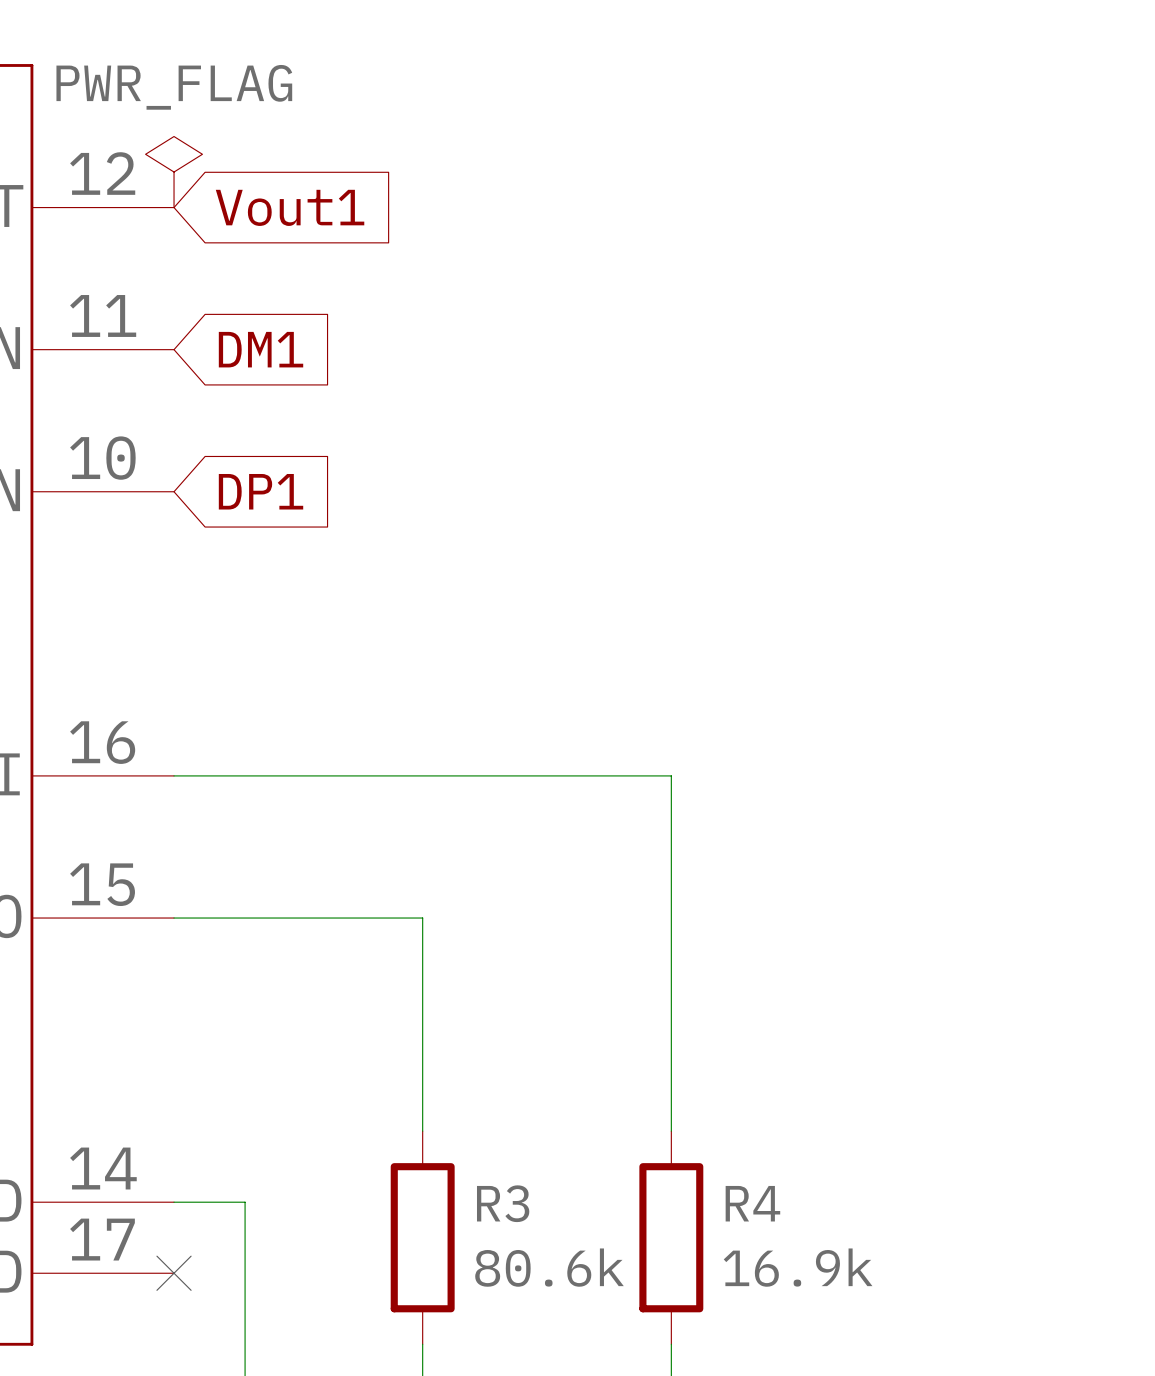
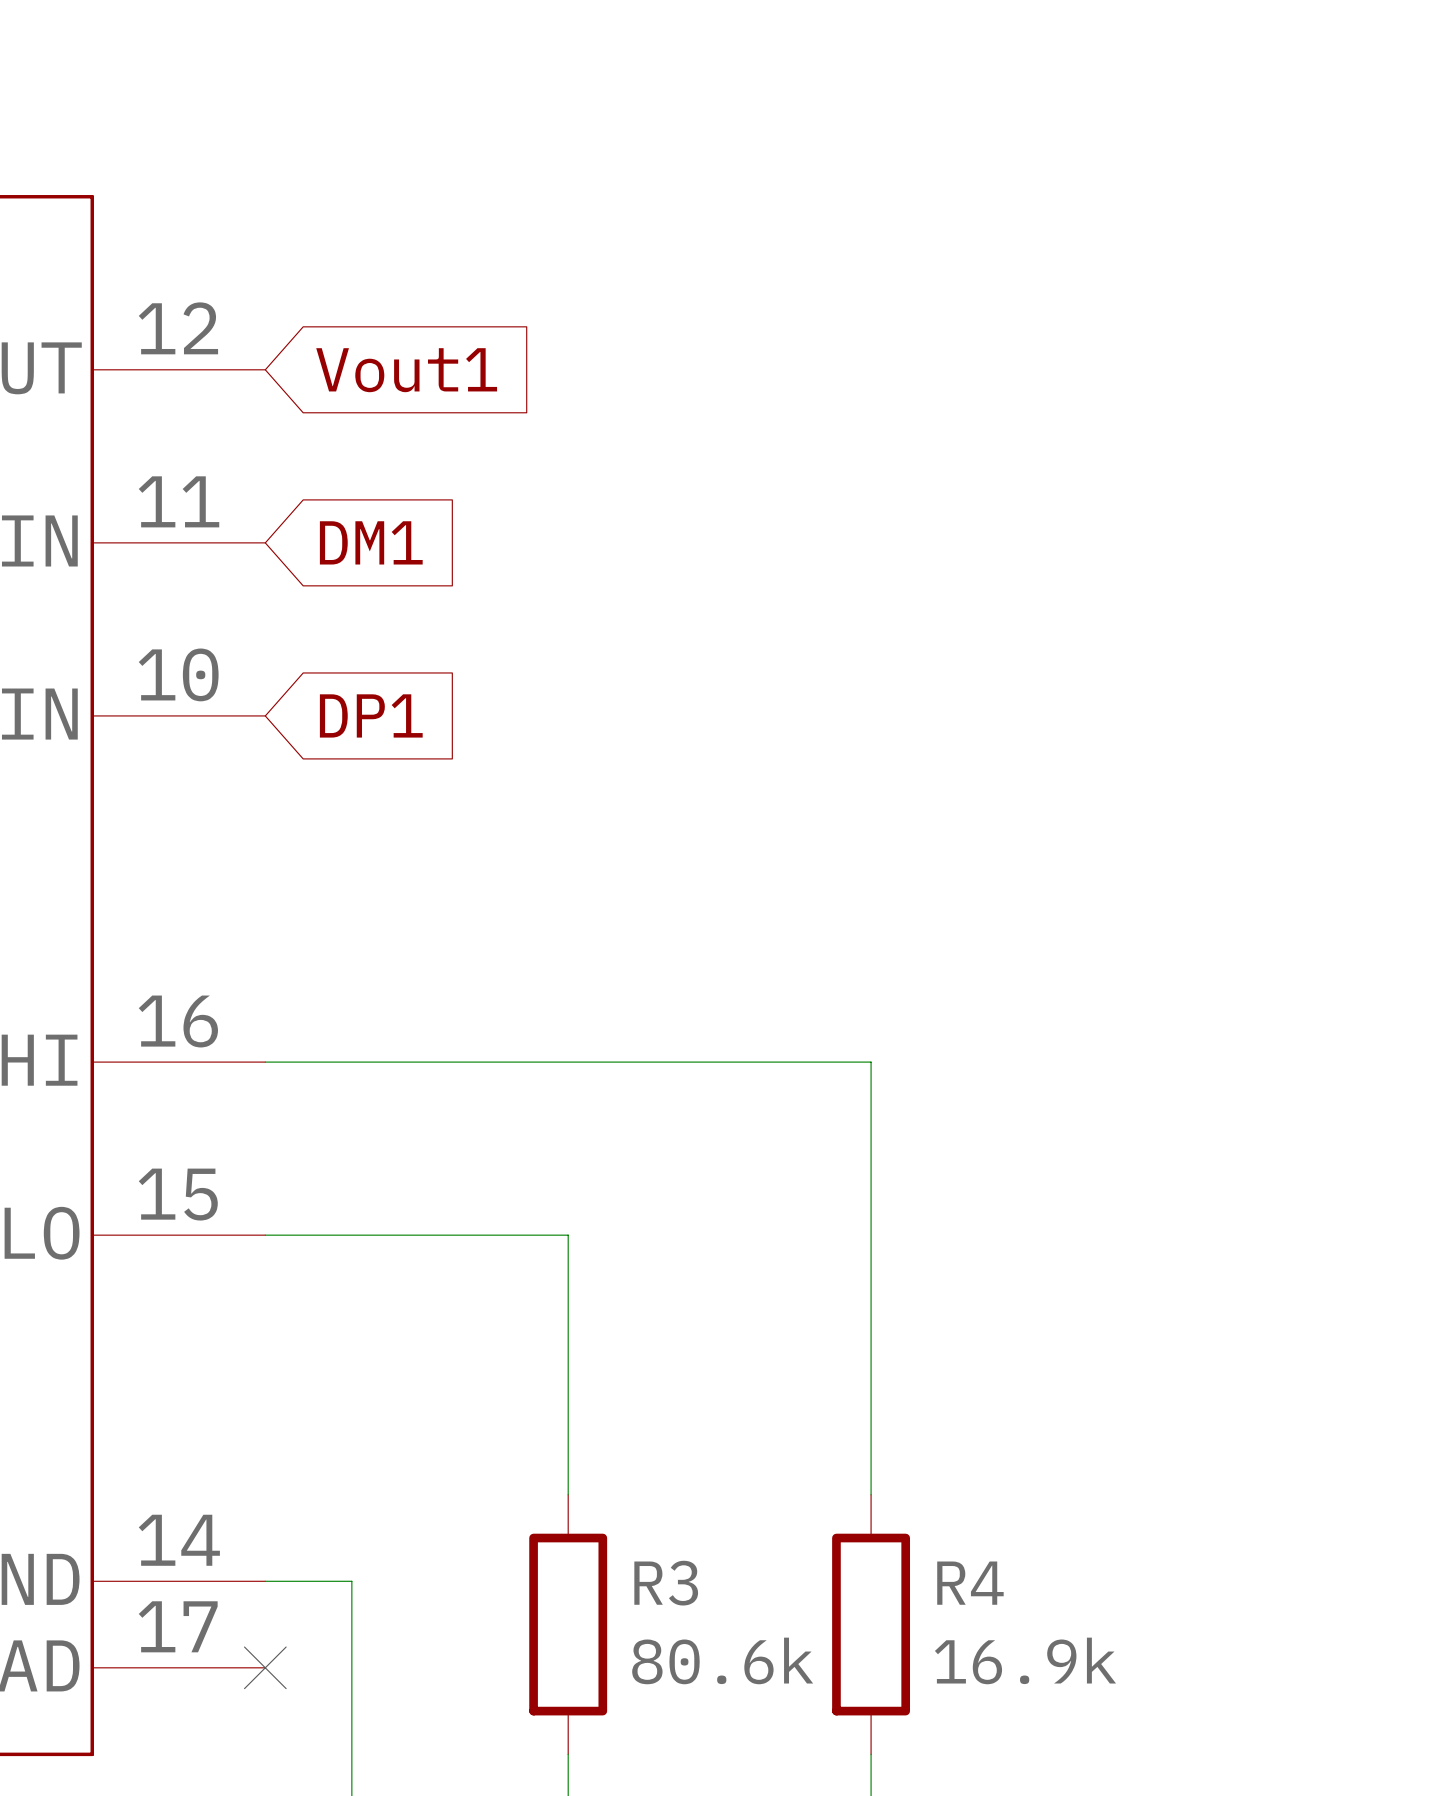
power symbol: PWR_FLAG (174, 172) -> none

